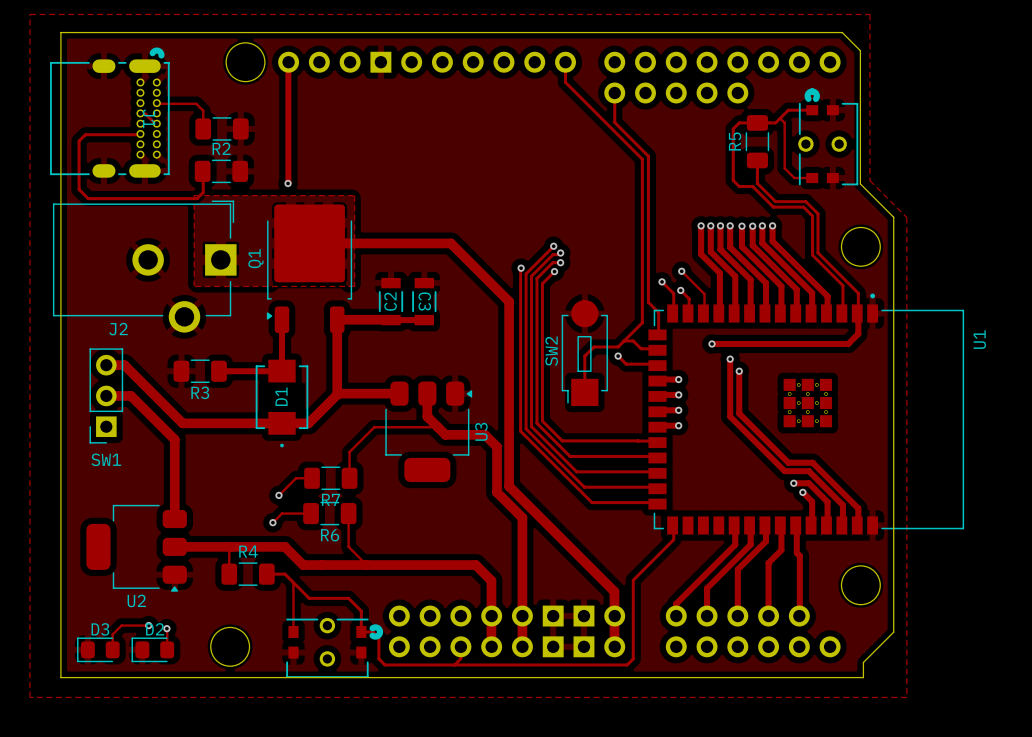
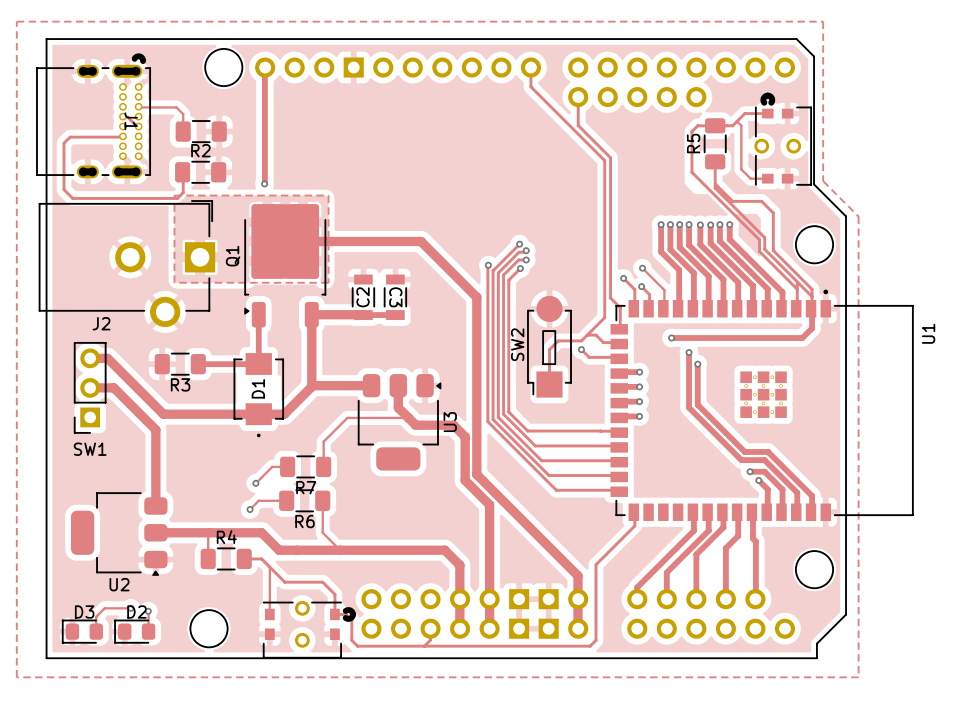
track: (733, 171) (733, 180) (739, 186) (752, 186) (773, 207) (803, 207) (812, 216) (812, 255) -> (715, 183) (715, 188) (764, 237) (764, 249) (768, 252)
track: none -> (691, 172) (759, 239) (759, 251) (797, 289)

